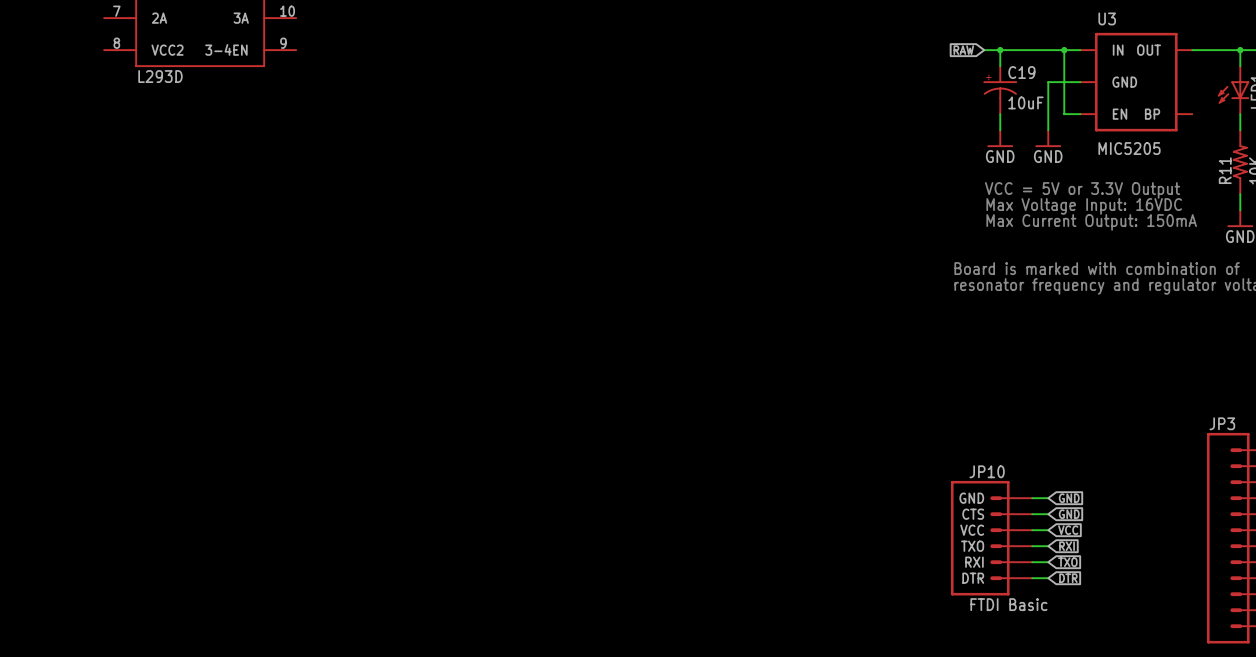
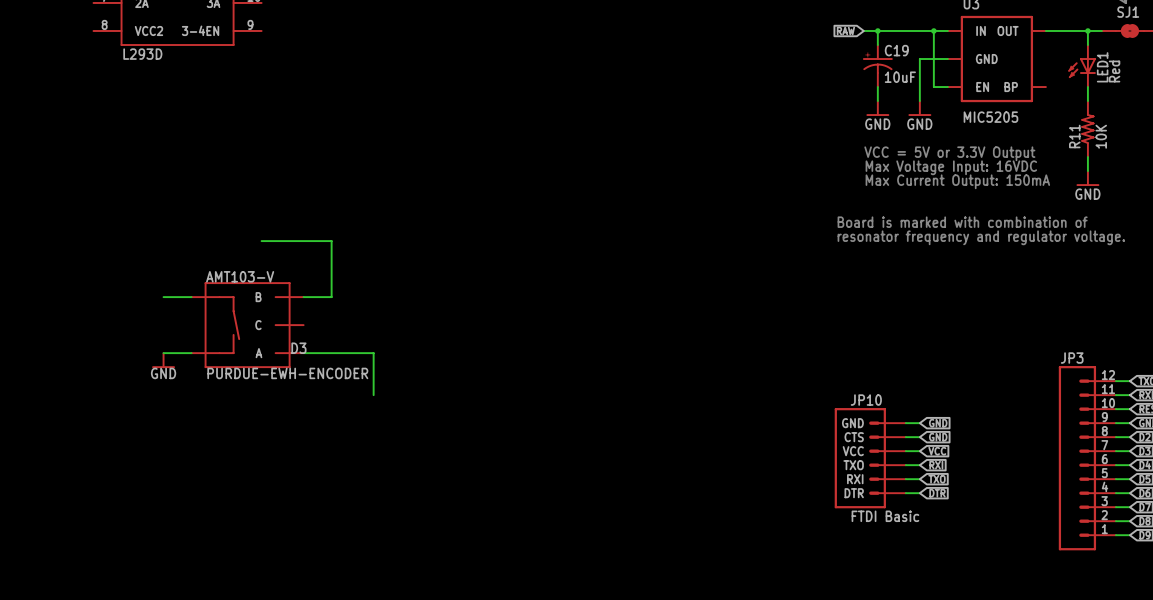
wire: none -> (261, 241) (331, 241) (331, 297) (303, 297)
wire: none -> (163, 297) (191, 297)
AMT103-V: none -> PURDUE-EWH-ENCODER (247, 325)
label: none -> D3 (298, 348)
wire: none -> (163, 353) (191, 353)
wire: none -> (303, 353) (373, 353) (373, 395)
power symbol: none -> GND (163, 360)

